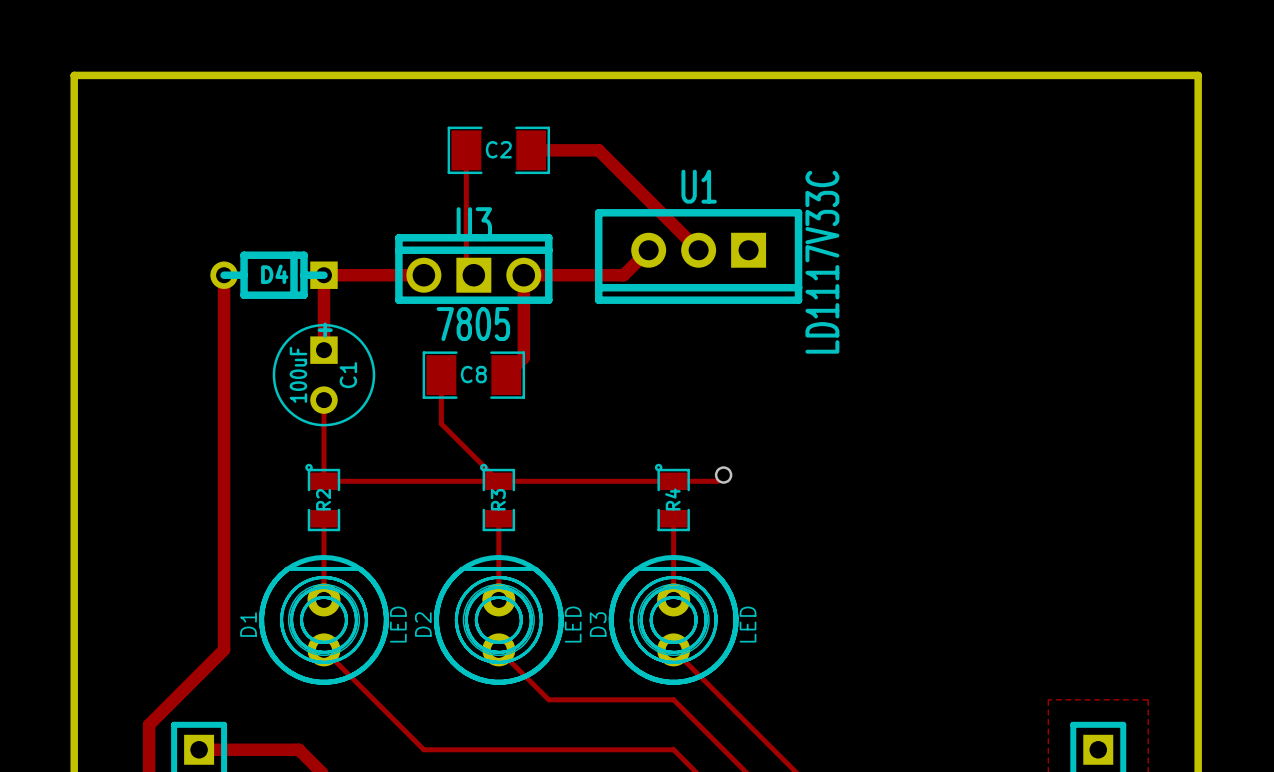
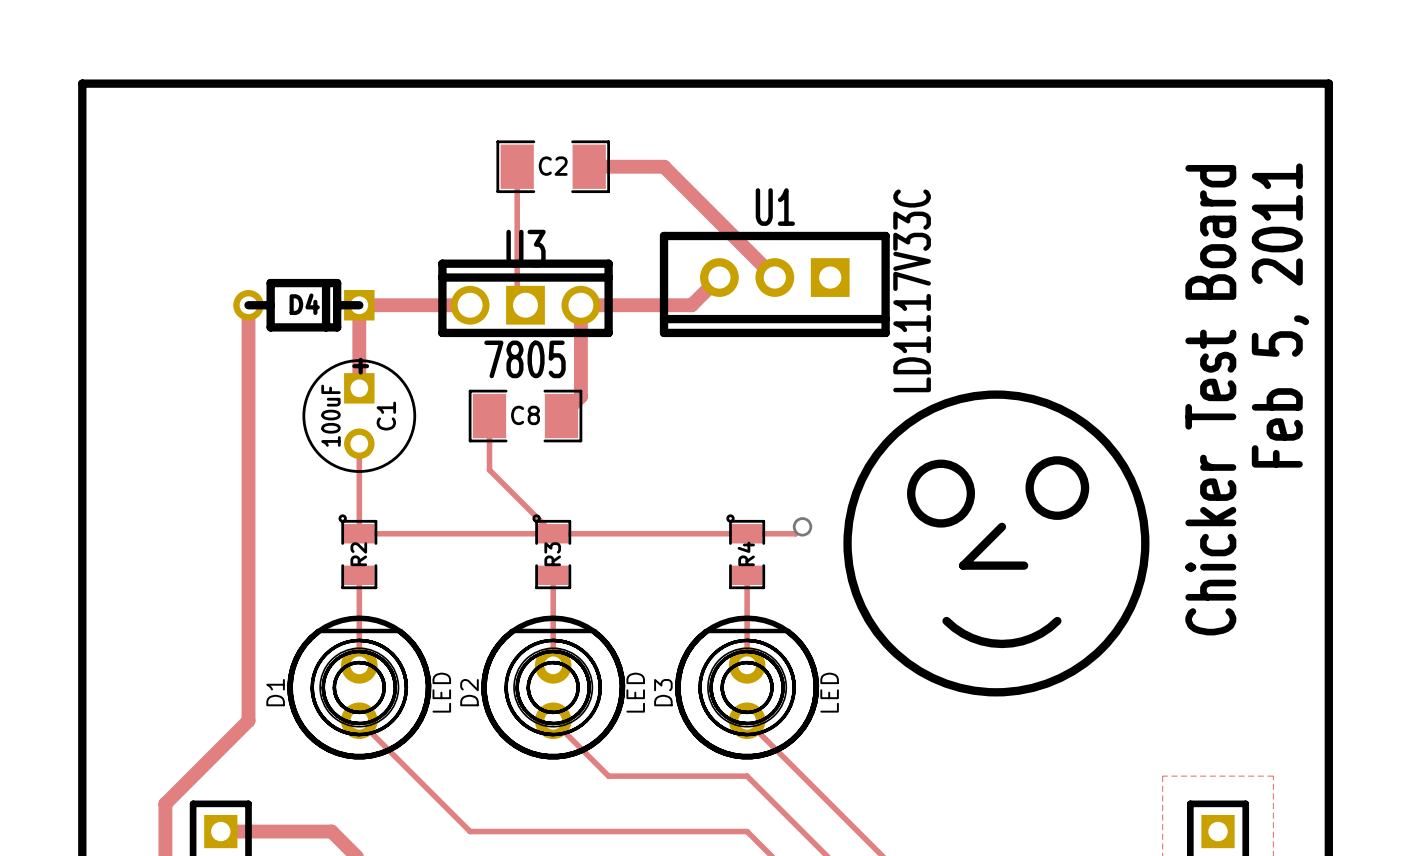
text: none -> Feb 5, 2011 (1280, 315)
drawing: none -> [843, 390, 1150, 697]
text: none -> Chicker Test Board (1210, 400)
line: none -> (1001, 526) (963, 565) (1024, 565)
line: none -> (946, 621) (971, 638) (1001, 643) (1031, 638) (1057, 621)

